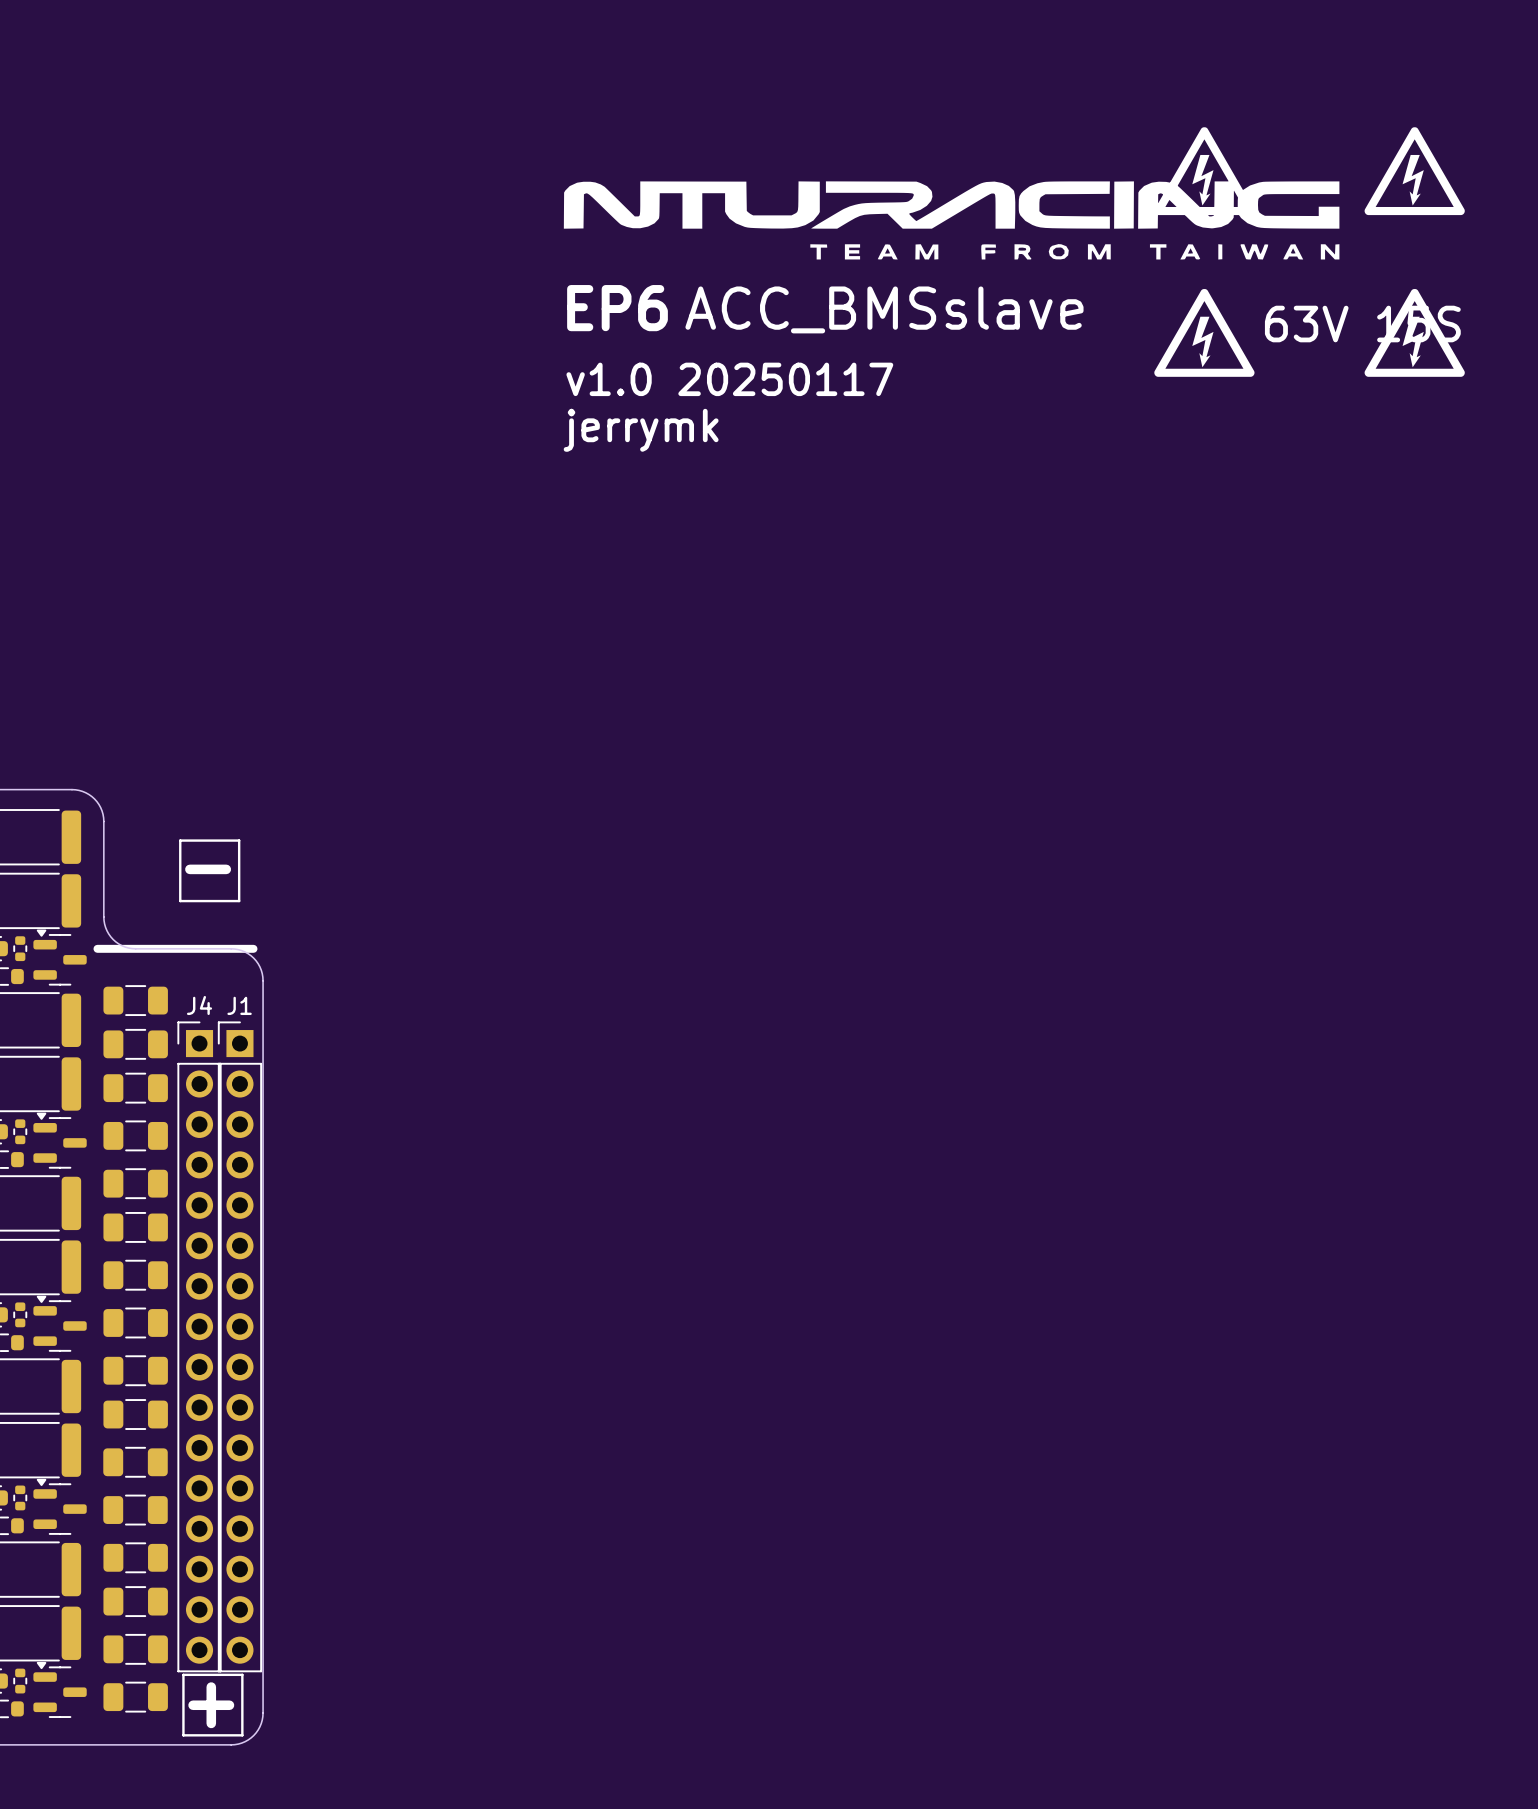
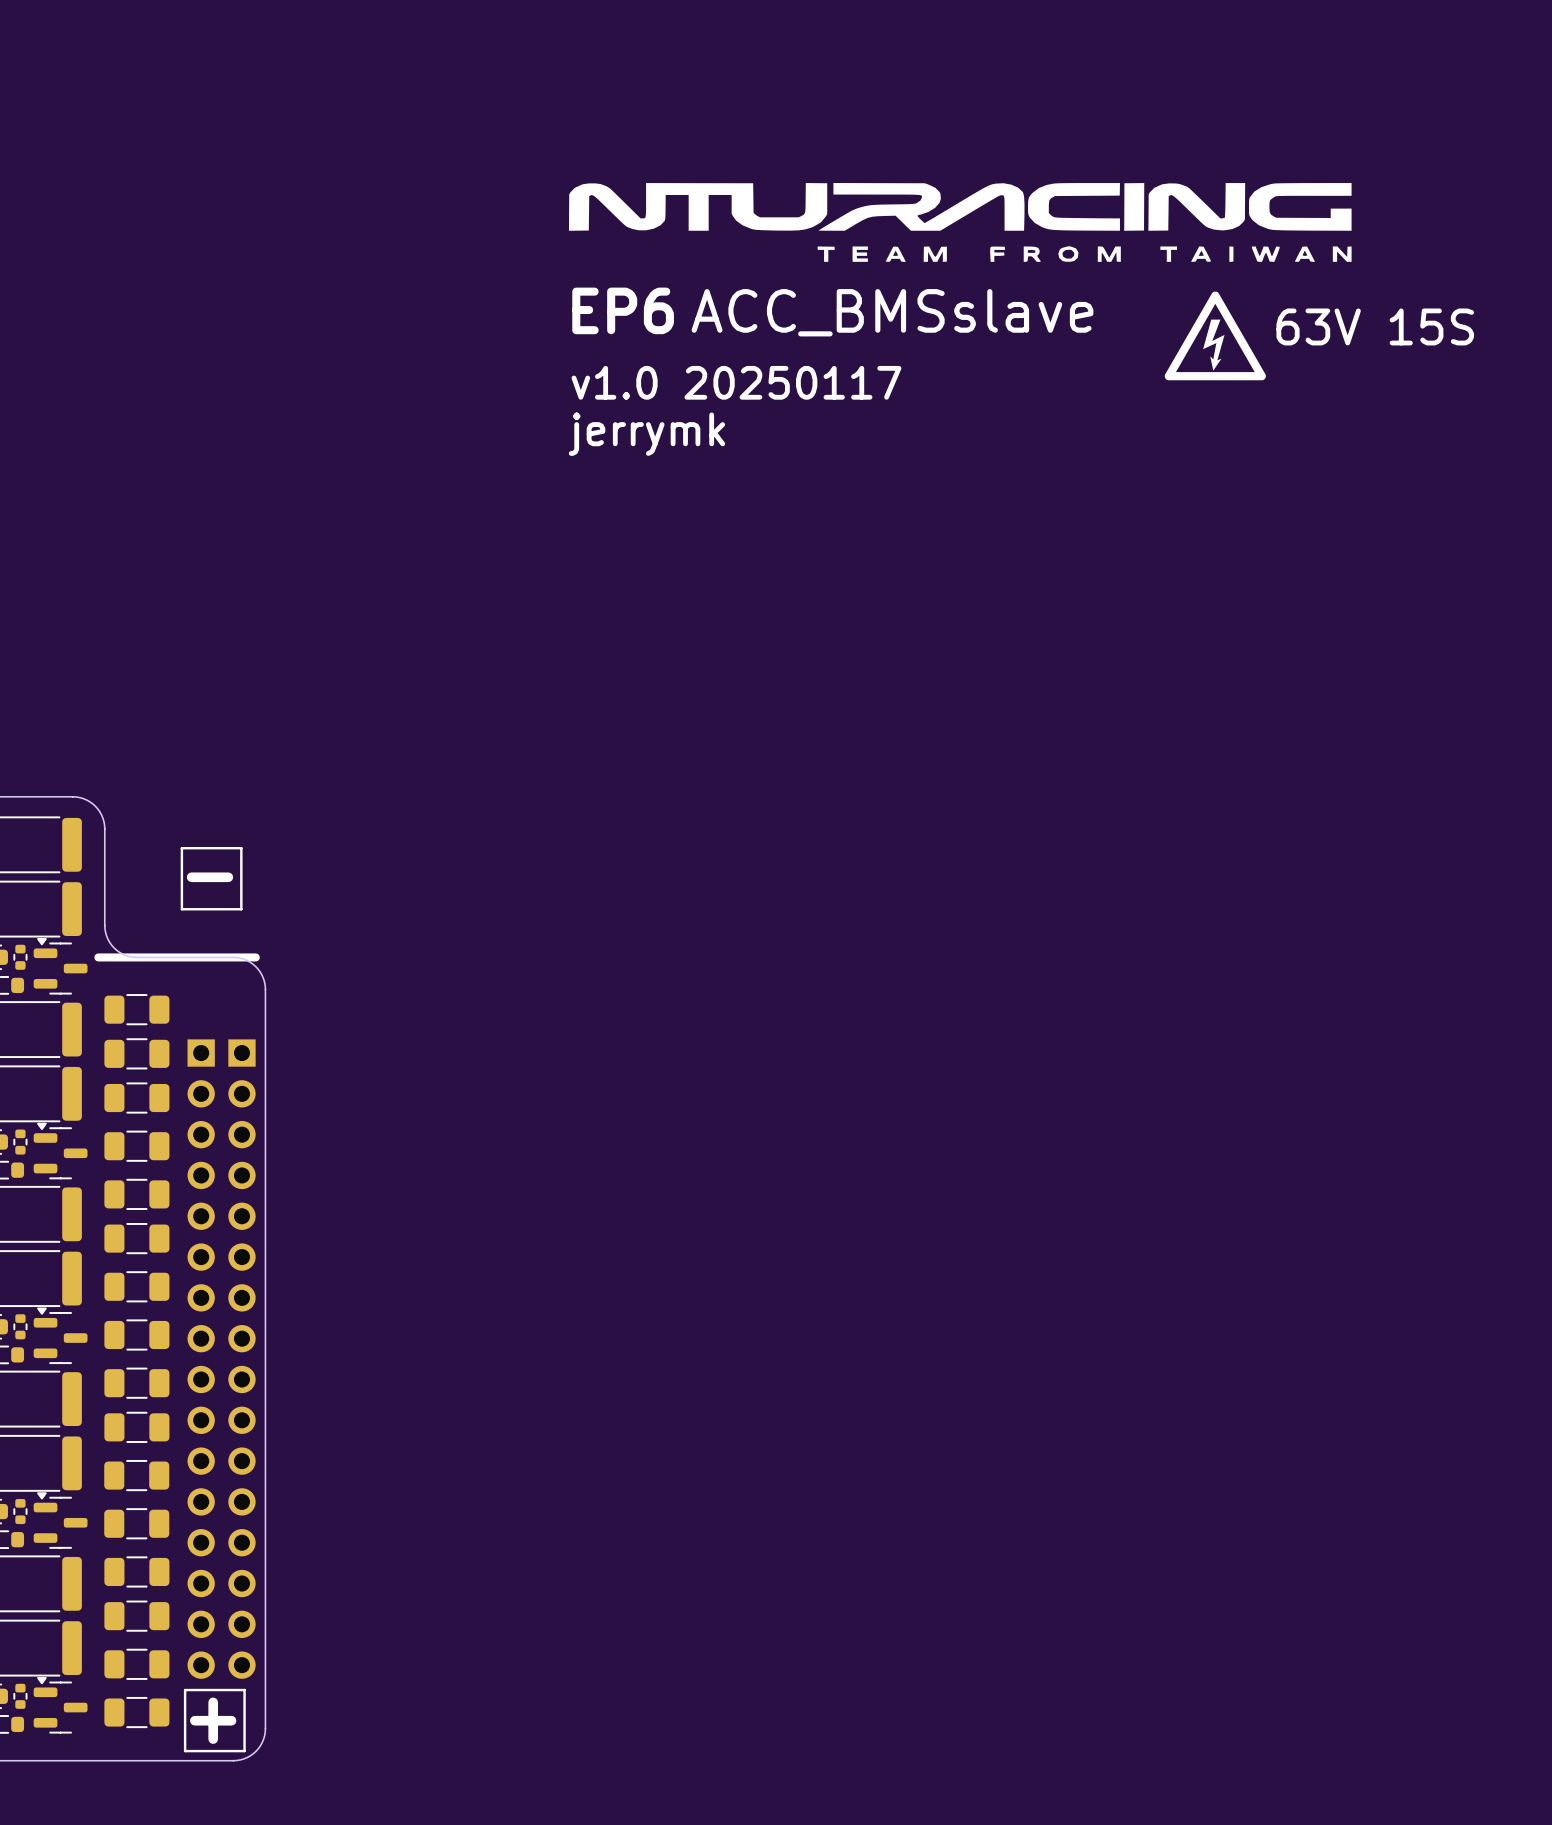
drawing: [1154, 127, 1255, 216] -> none
drawing: [1364, 127, 1465, 216] -> none
drawing: [1364, 289, 1465, 377] -> none
J4: (199, 1346) -> none
J1: (239, 1346) -> none

